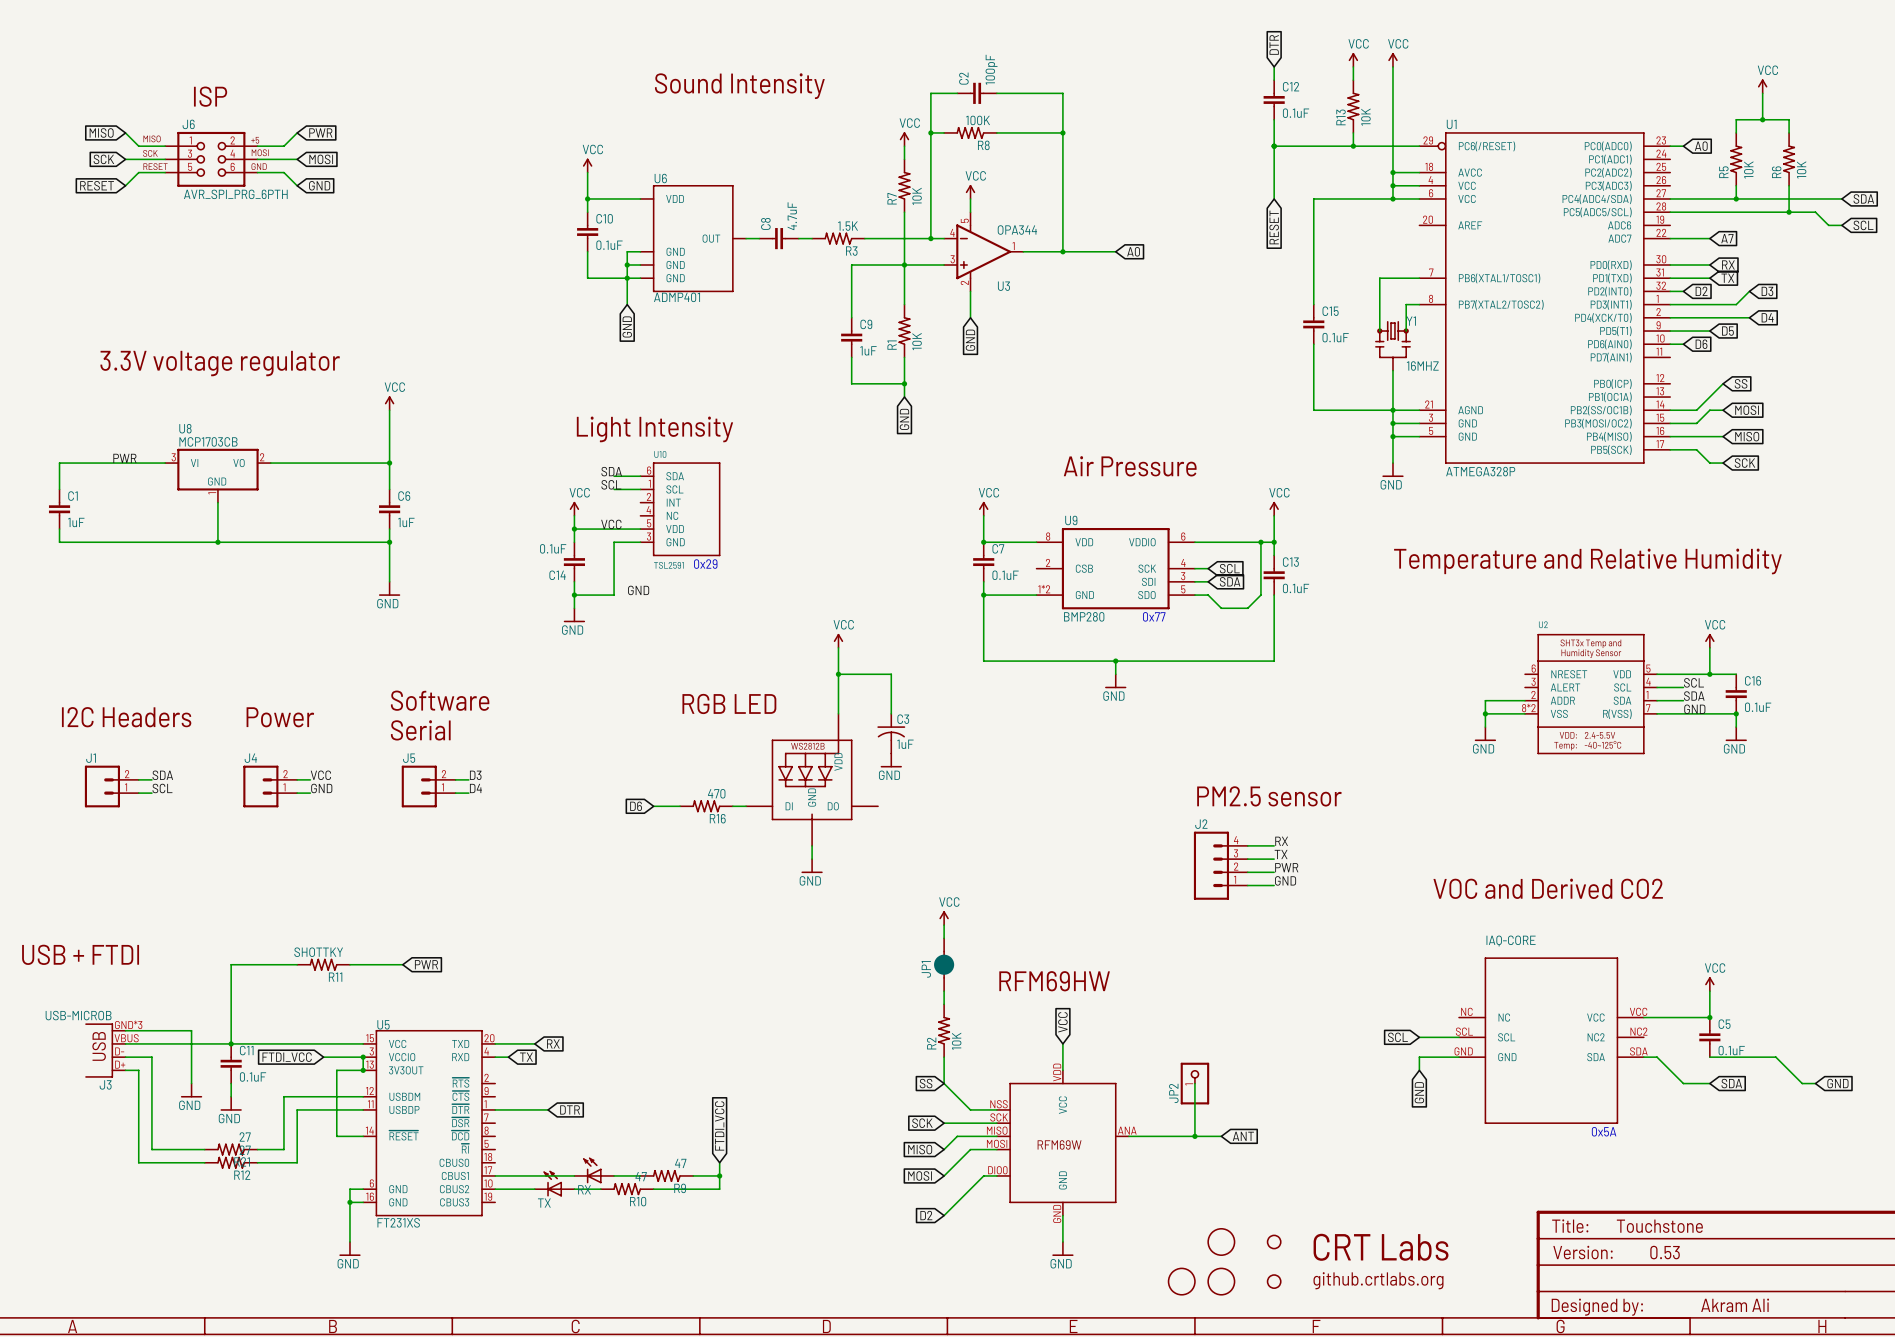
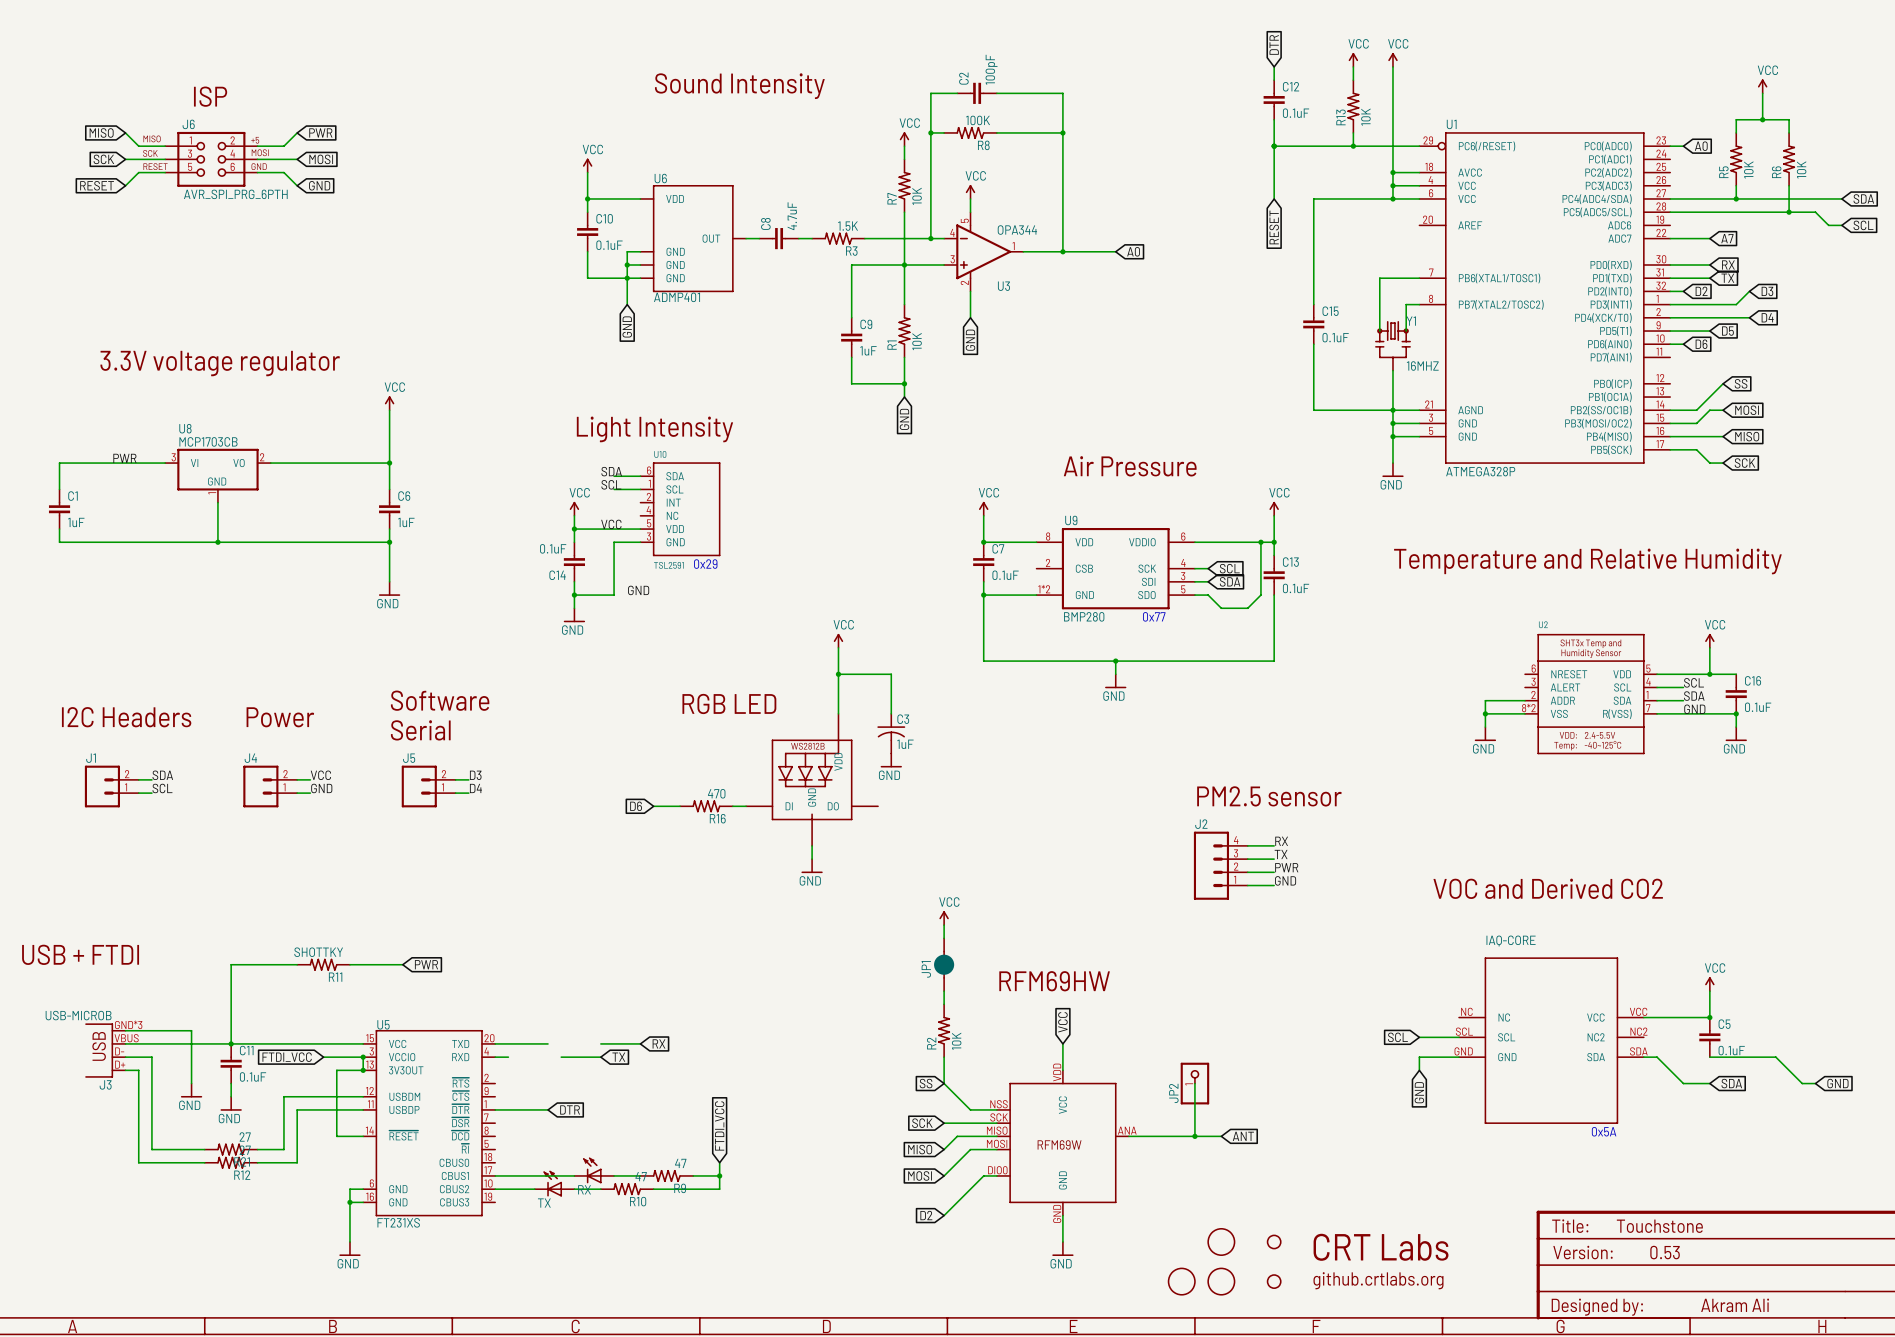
wire: none -> (534, 1043) (548, 1043)
global label position: RX (553, 1043) -> RX (659, 1043)
wire: none -> (600, 1043) (640, 1043)
global label position: TX (526, 1057) -> TX (618, 1057)
wire: none -> (561, 1057) (600, 1057)

